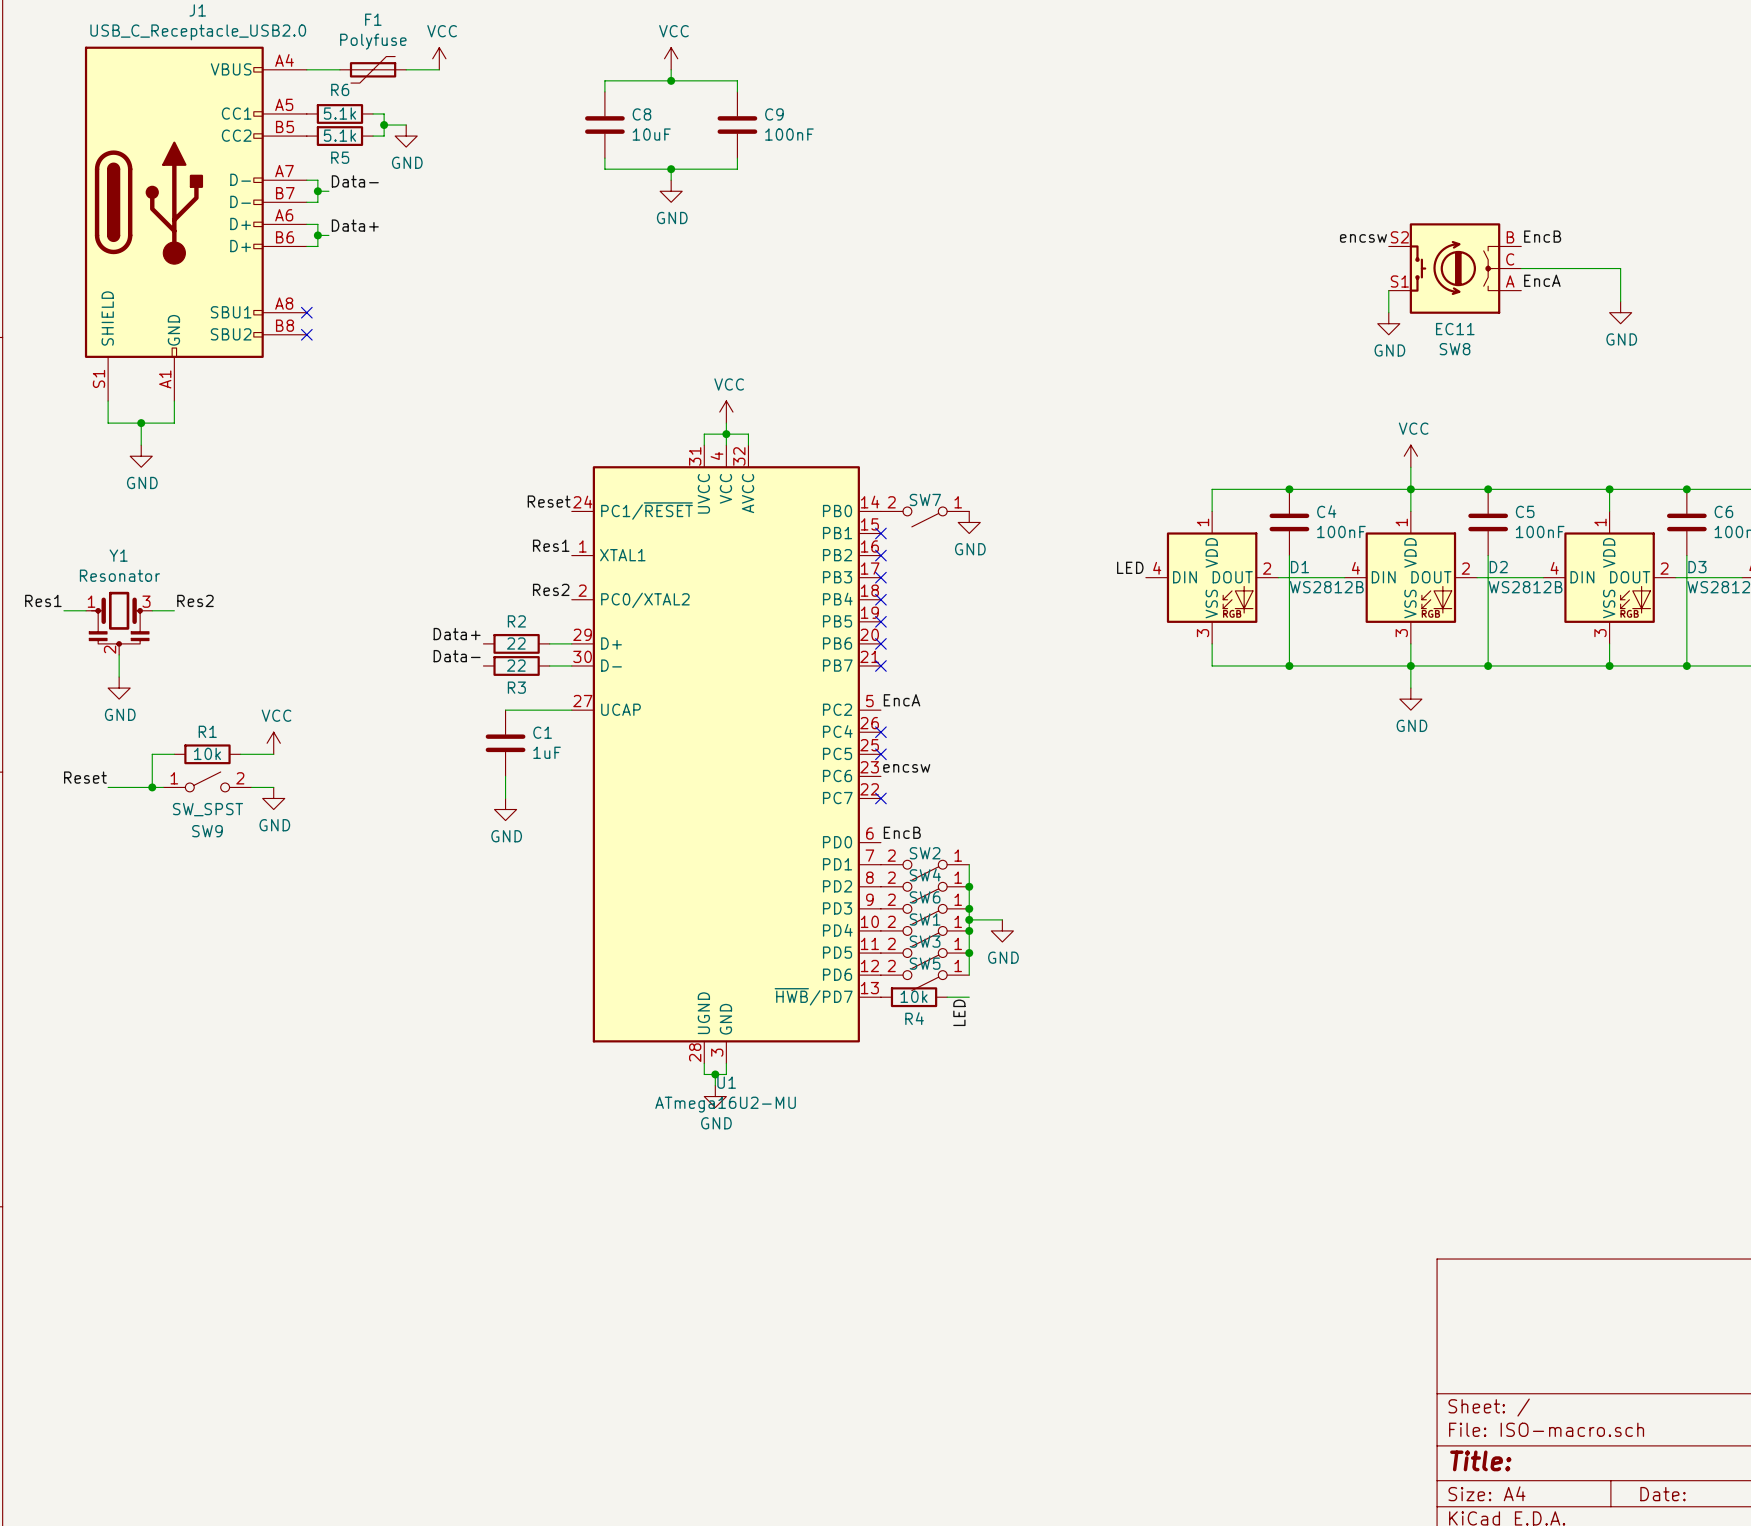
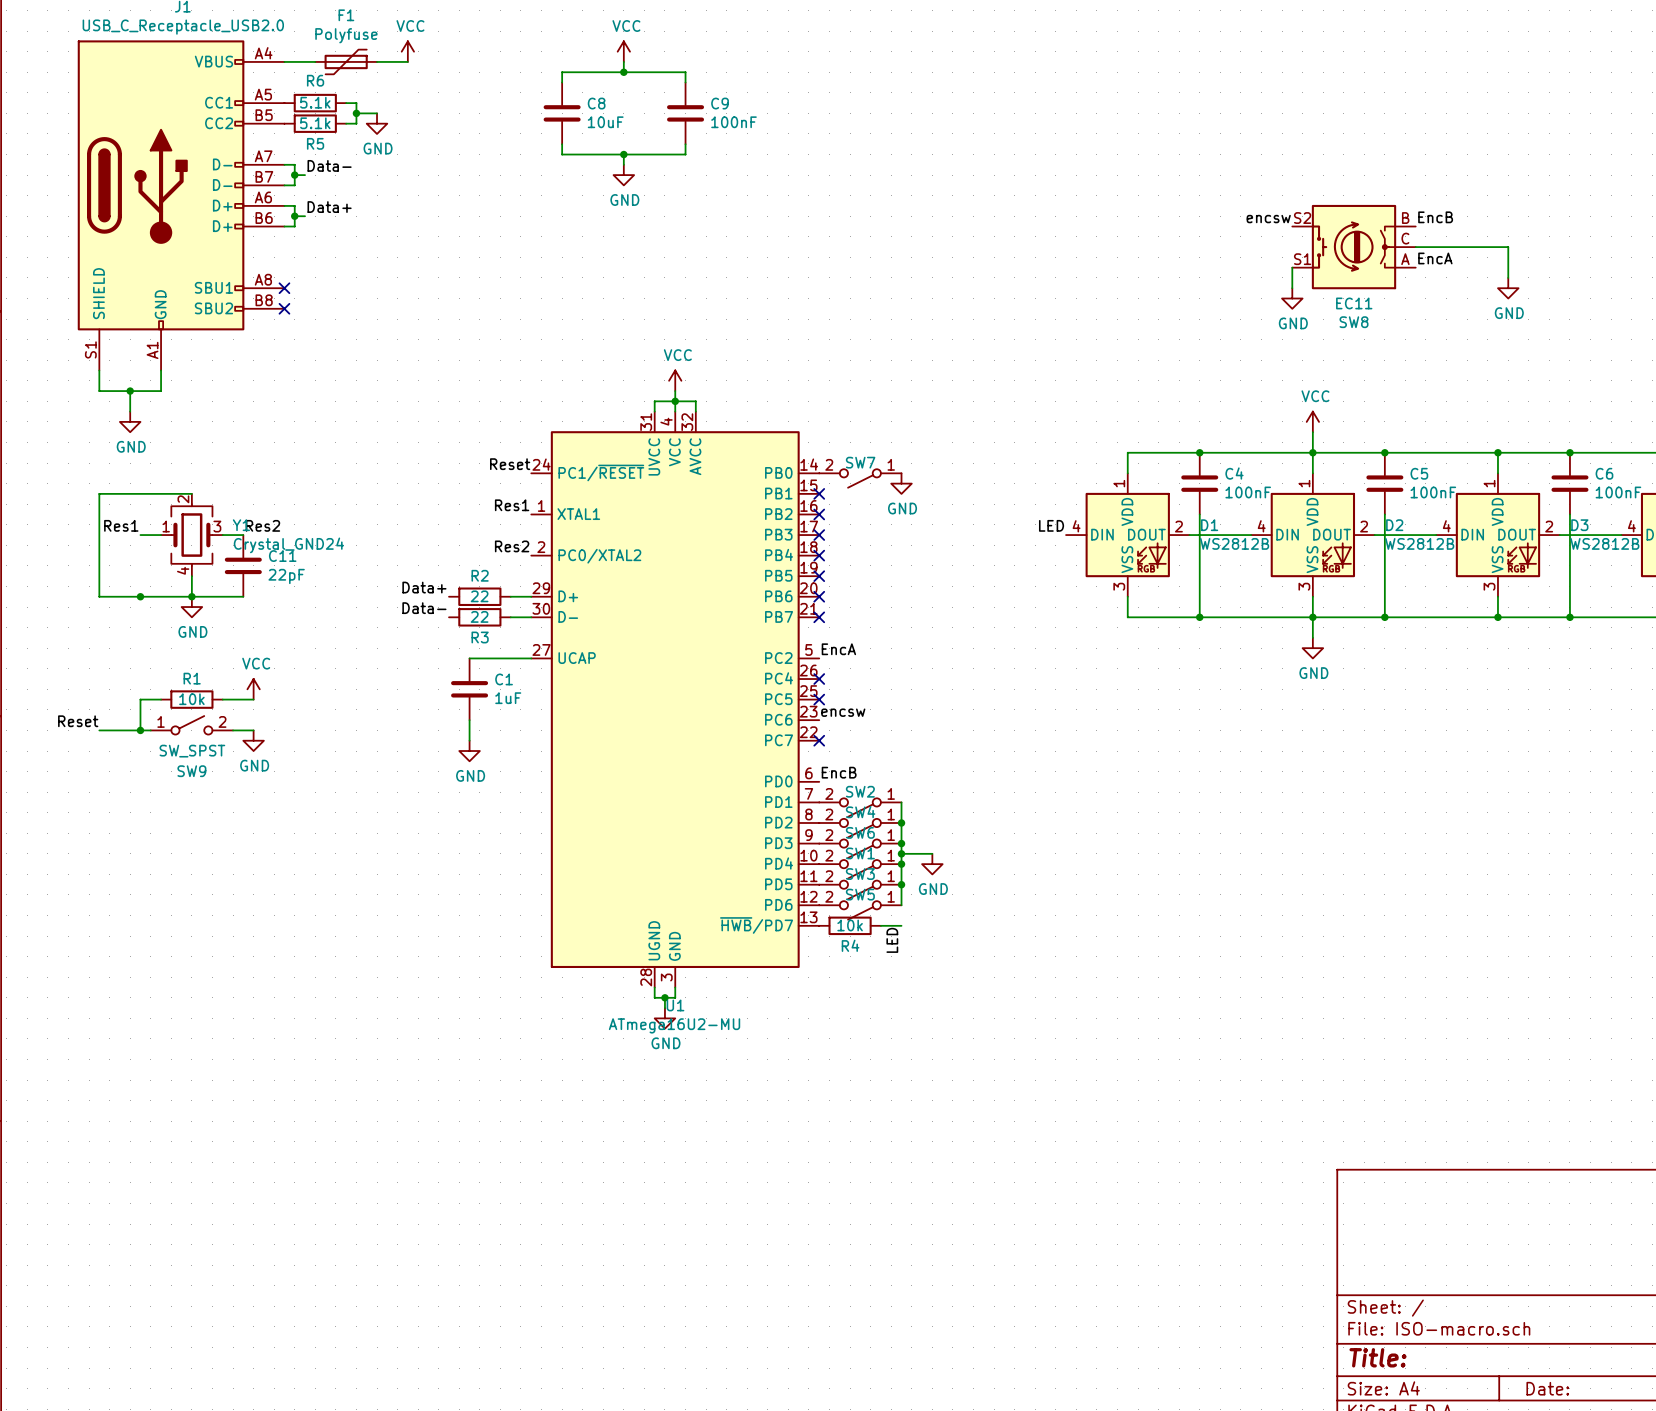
wire: none -> (191, 493) (99, 493) (99, 596) (243, 596)
Y1 name position: Y1 (118, 555) -> Y1 (241, 525)
Y1 value: Resonator (119, 575) -> Crystal_GND24 (288, 545)
Y1 symbol: [86, 591, 153, 655] -> [161, 493, 223, 577]
label position: Res1 (43, 600) -> Res1 (121, 525)
label position: Res2 (195, 600) -> Res2 (262, 525)
wire: (63, 610) (86, 610) -> (140, 535) (161, 535)
wire: (152, 610) (174, 610) -> (222, 535) (243, 535)
C11: none -> 22pF (243, 565)
junction: none -> (140, 596)
junction: none -> (191, 596)
wire: (119, 654) (119, 677) -> (191, 576) (191, 596)
power symbol position: GND (119, 688) -> GND (191, 607)

